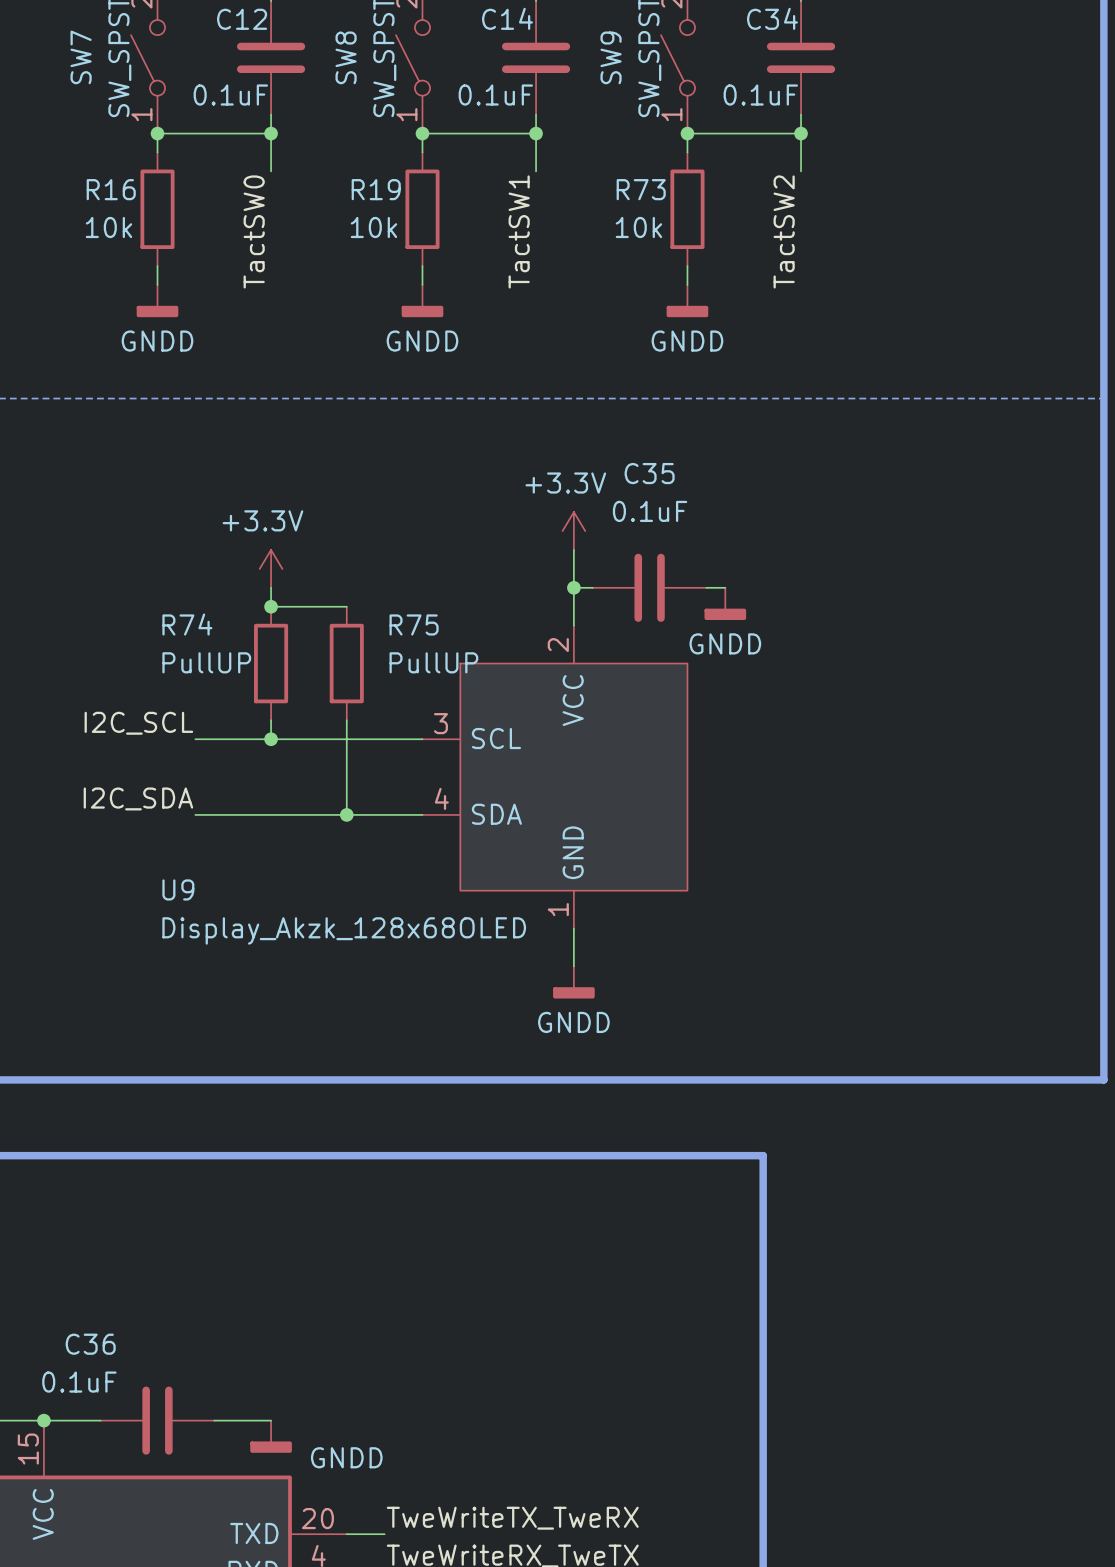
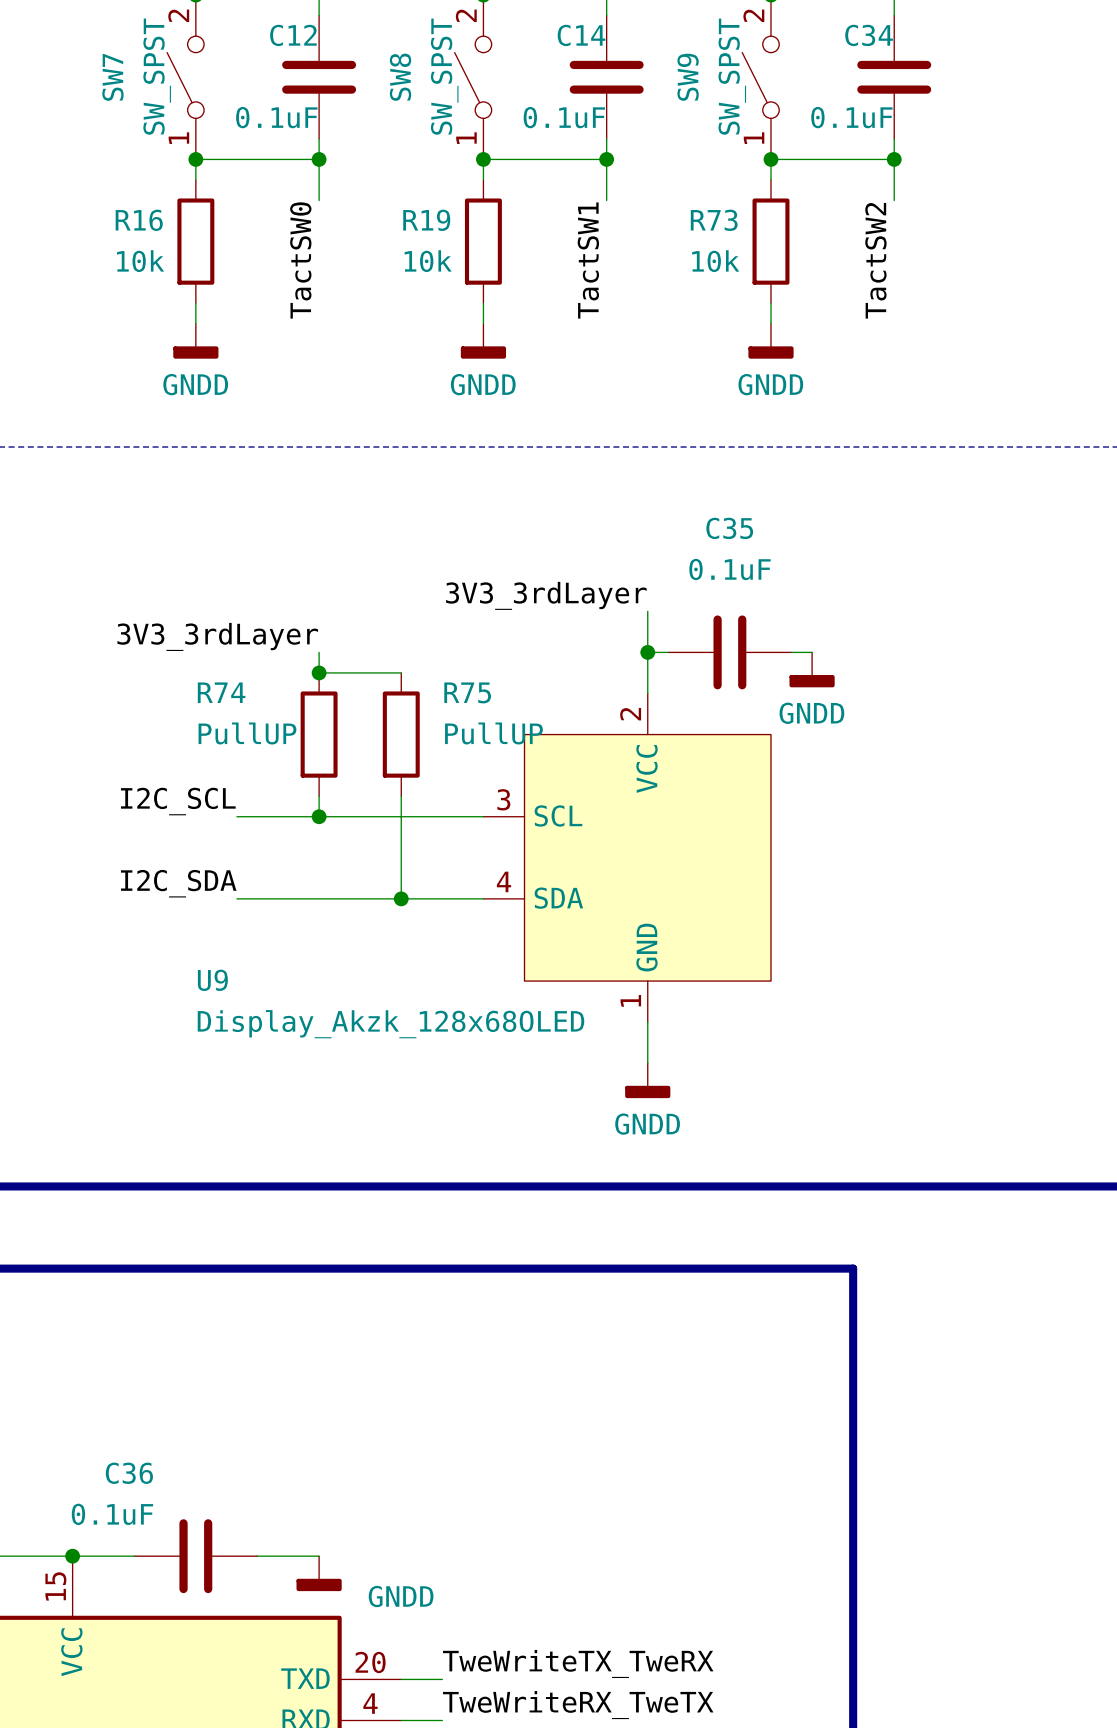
power symbol: +3.3V (573, 531) -> none
label: none -> 3V3_3rdLayer (546, 595)
power symbol: +3.3V (271, 568) -> none
label: none -> 3V3_3rdLayer (217, 636)

